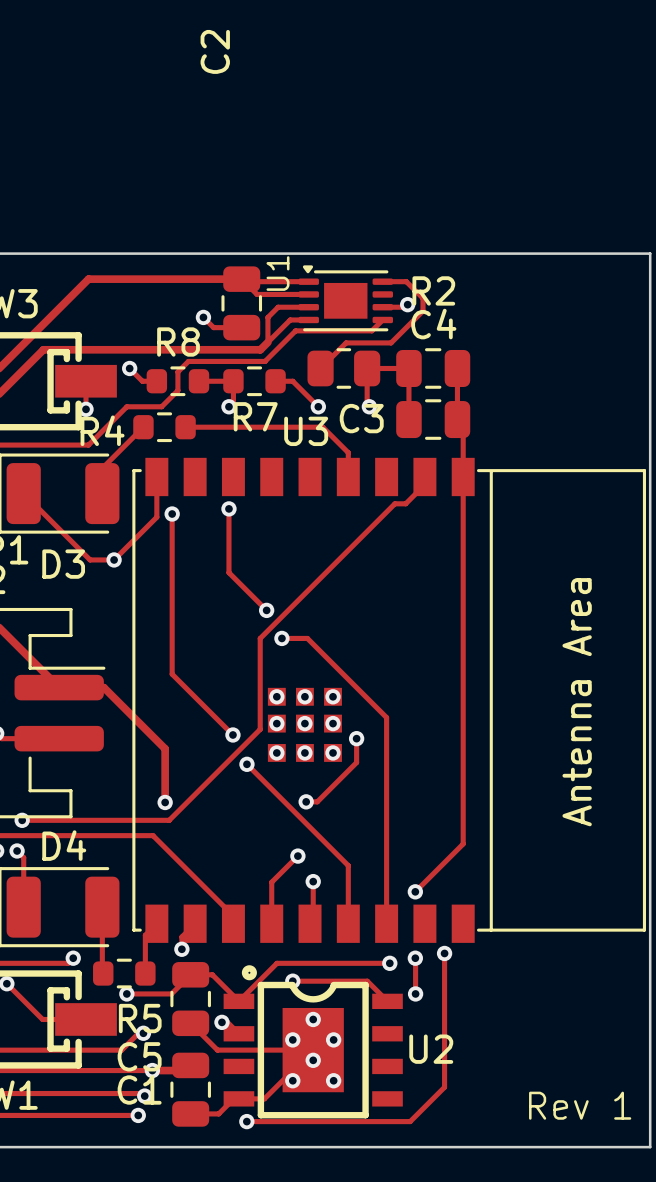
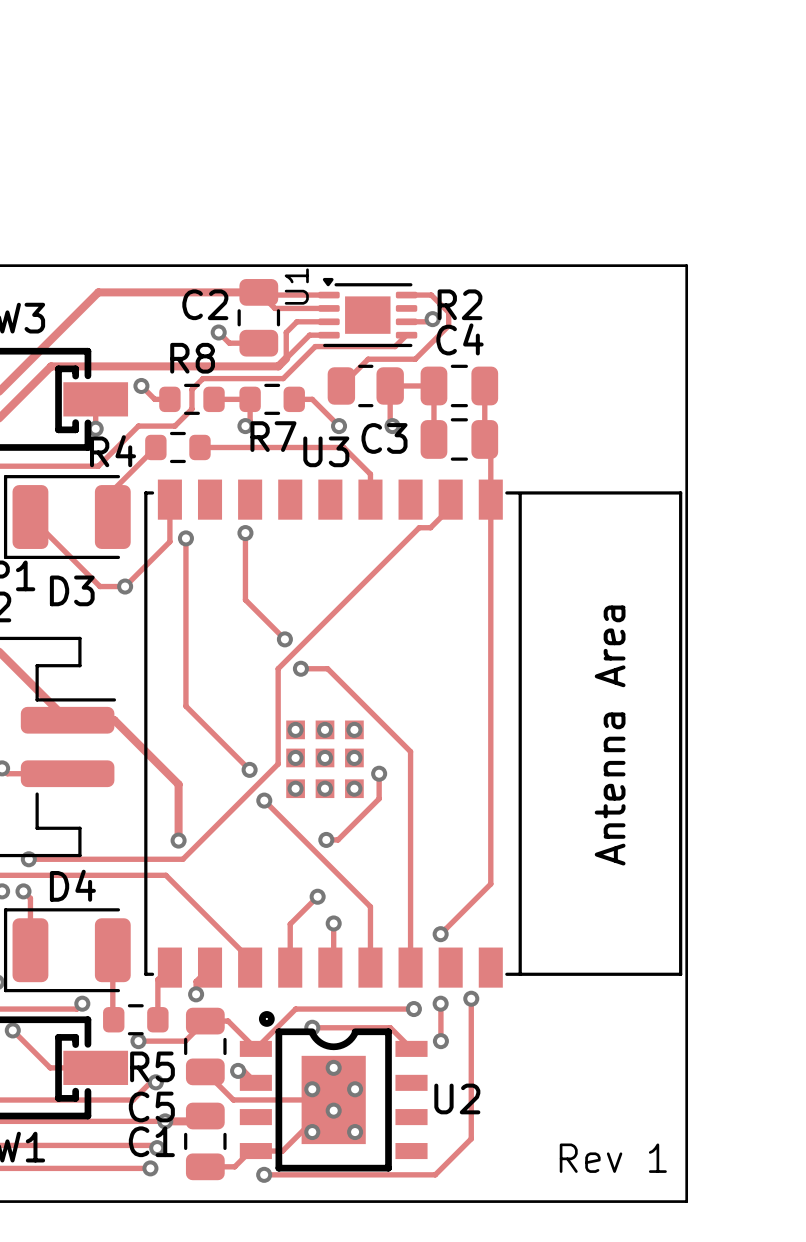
C2 name rotation: 0° (215, 51) -> 90° clockwise (205, 304)
C2 name position: C2 (215, 51) -> C2 (205, 304)

